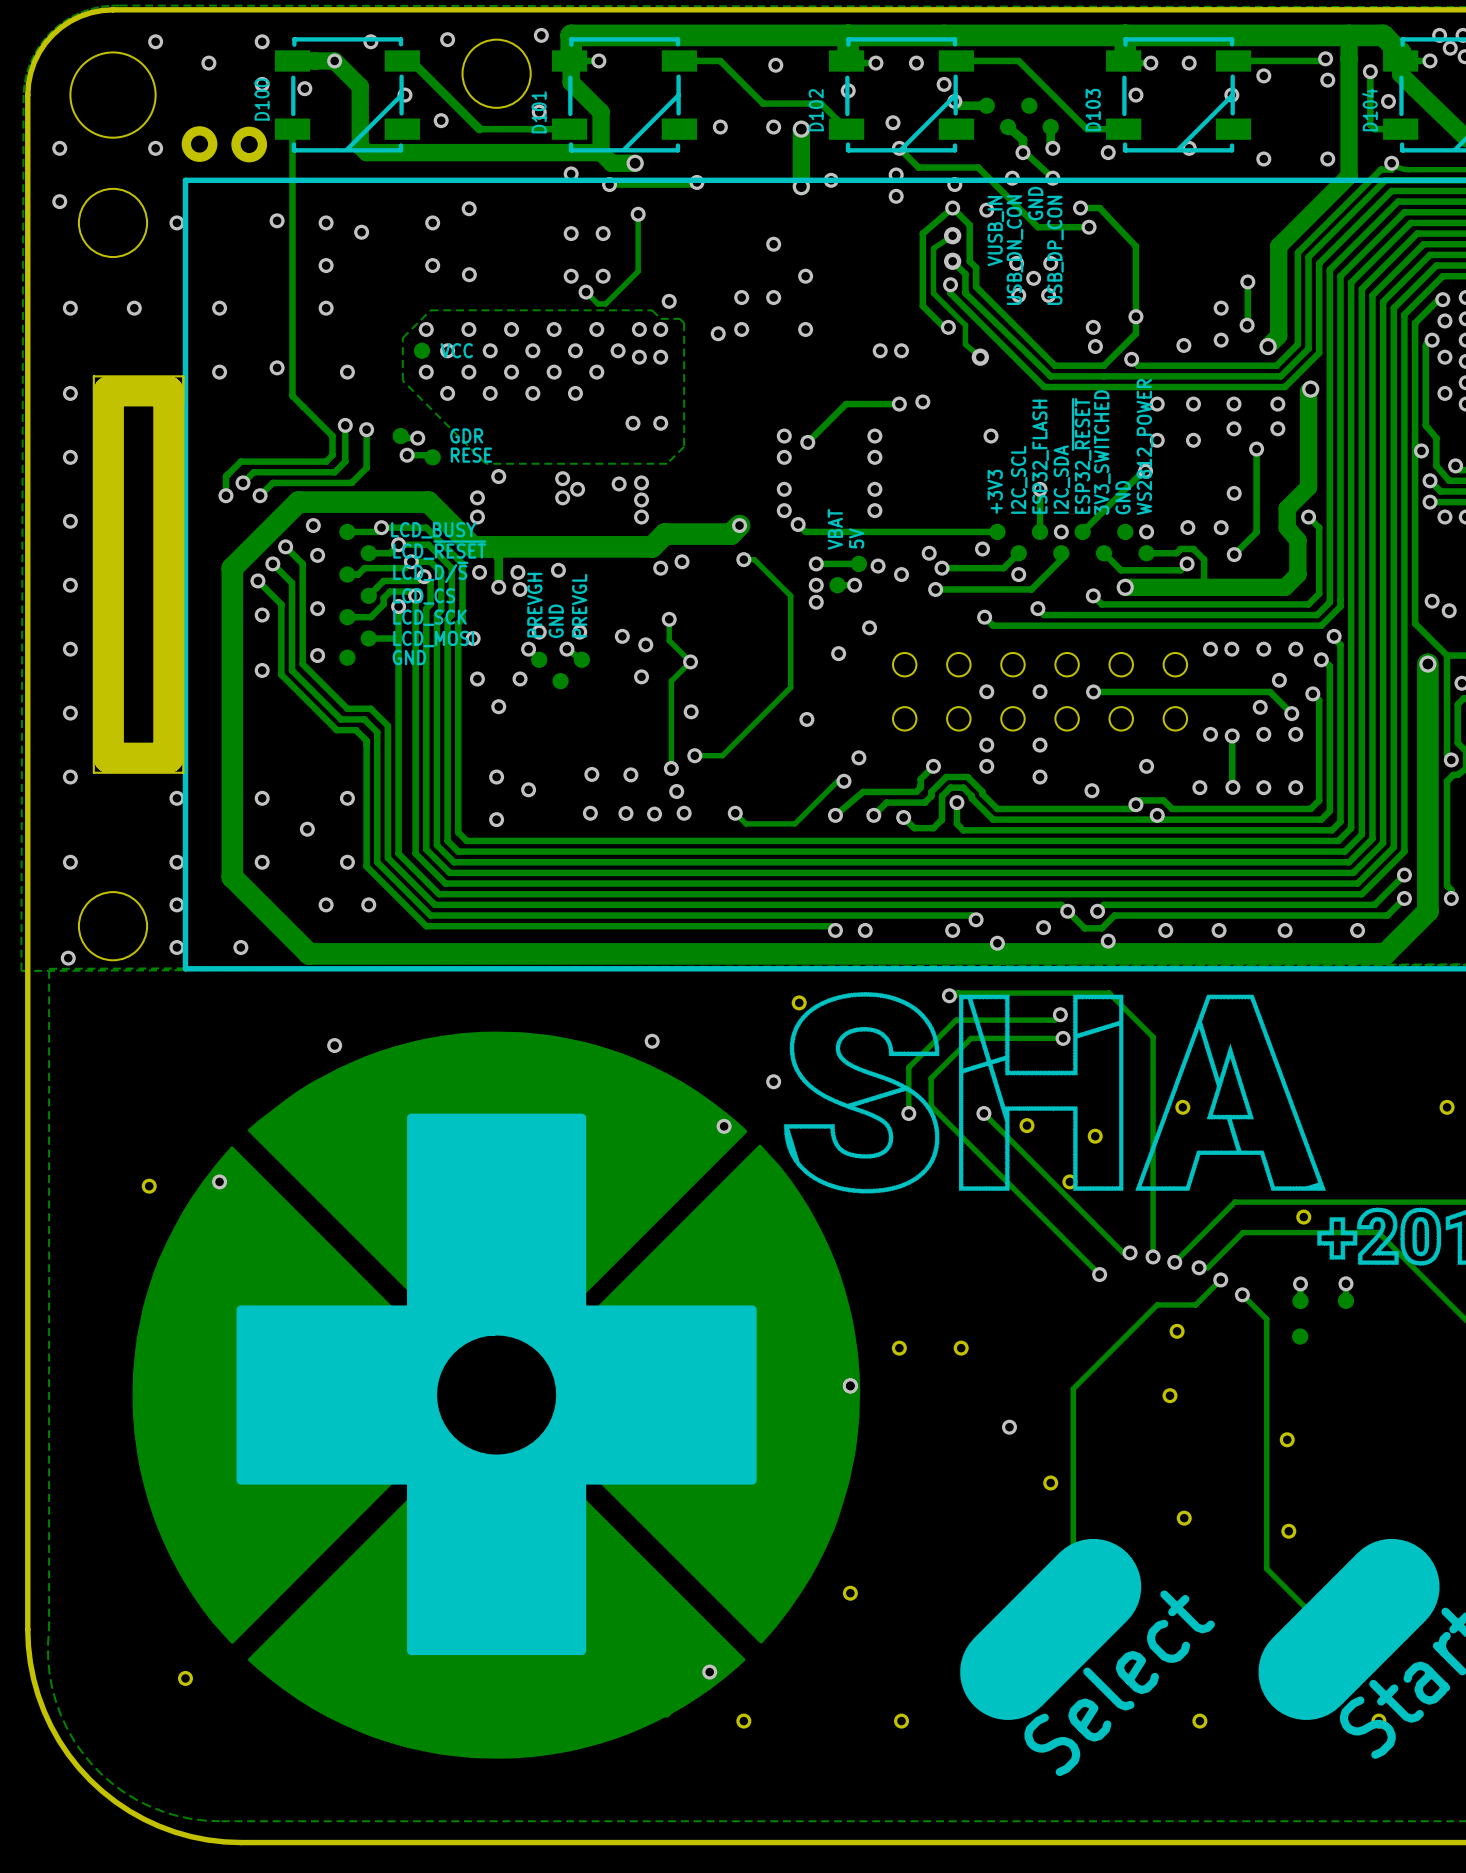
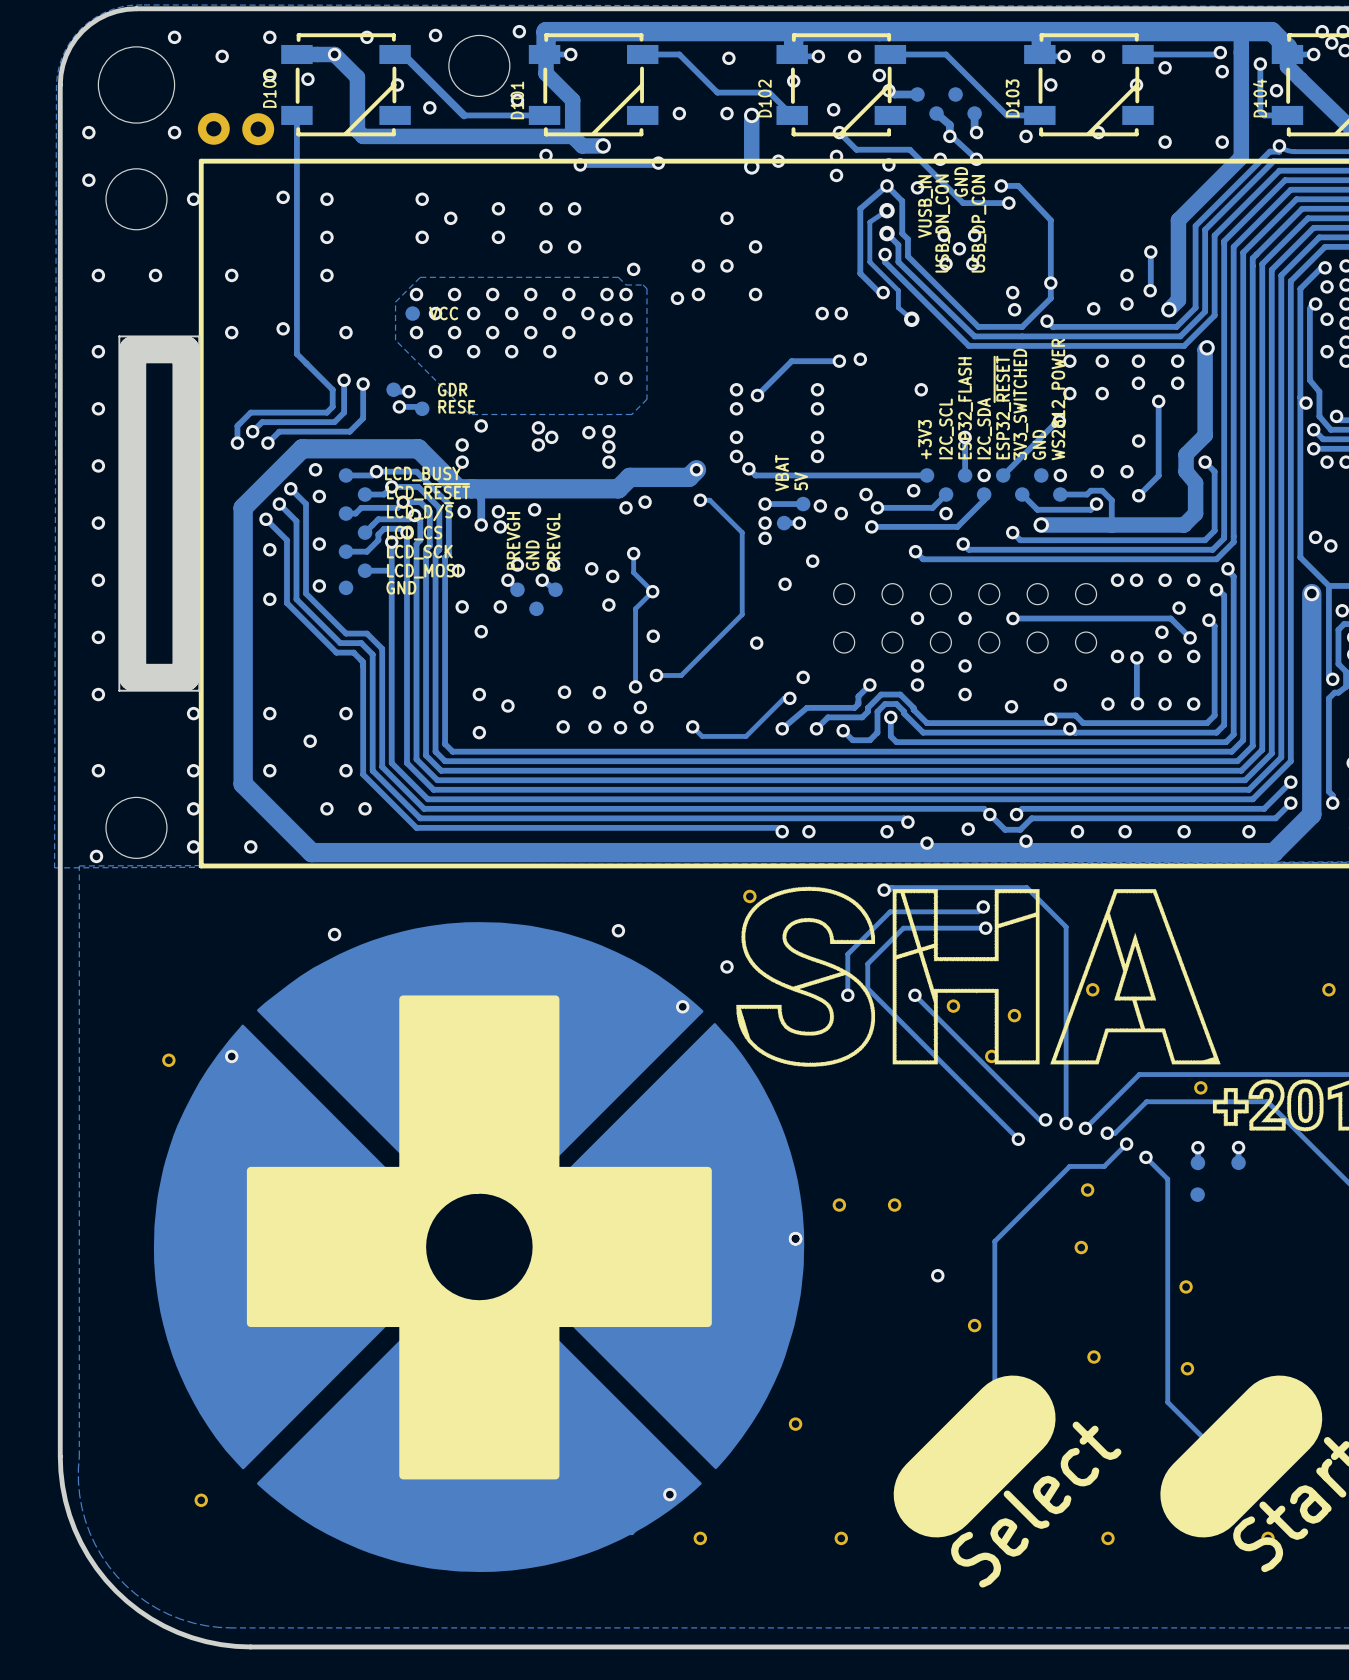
via: (469, 208) -> none
track: (638, 214) (638, 271) (605, 303) (597, 303) (586, 292) -> none
via: (638, 214) -> none
via: (361, 232) -> none
via: none -> (498, 208)
via: none -> (450, 218)
via: none -> (498, 237)
via: (469, 274) -> none
via: (586, 292) -> none

